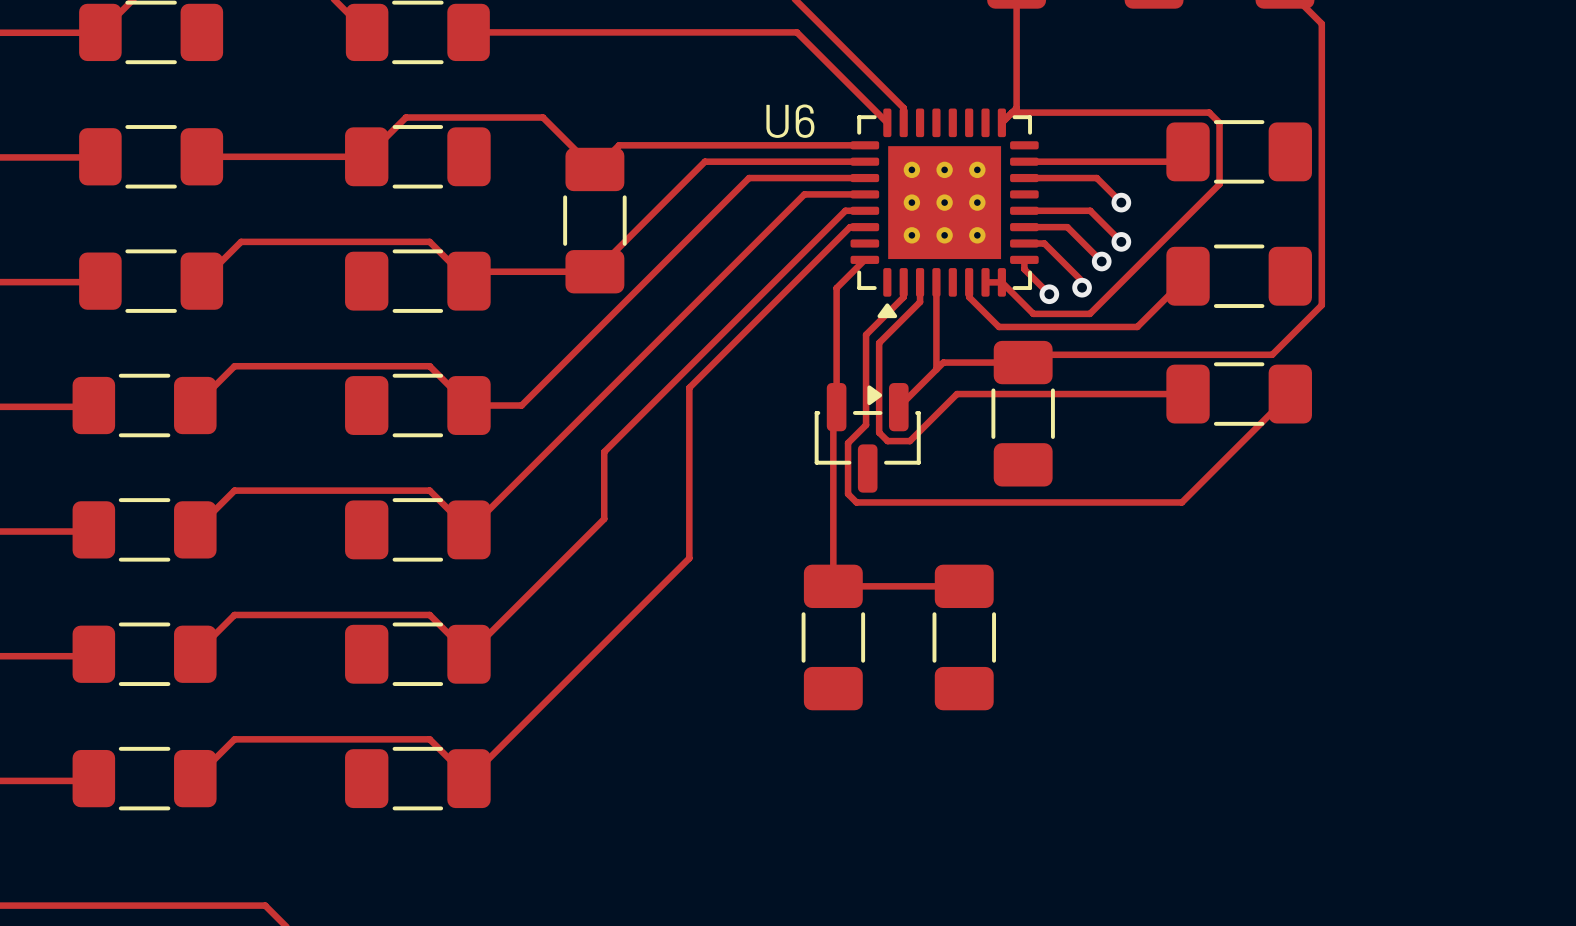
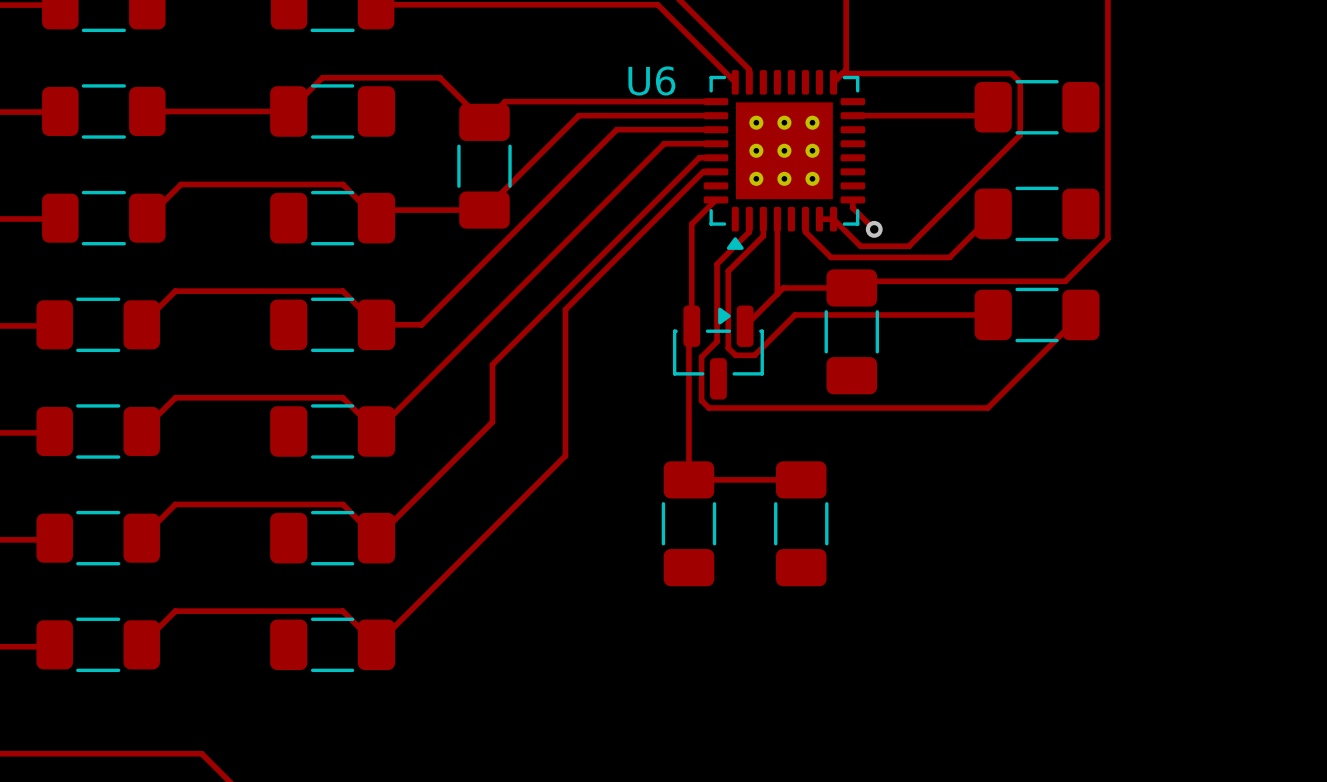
top track: (1024, 178) (1096, 178) (1121, 202) -> none
via: (1121, 202) -> none
top track: (1024, 210) (1090, 210) (1121, 241) -> none
top track: (1024, 227) (1067, 227) (1101, 261) -> none
via: (1121, 241) -> none
top track: (1024, 243) (1044, 243) (1082, 281) (1082, 287) -> none
via: (1101, 261) -> none
via: (1082, 287) -> none

